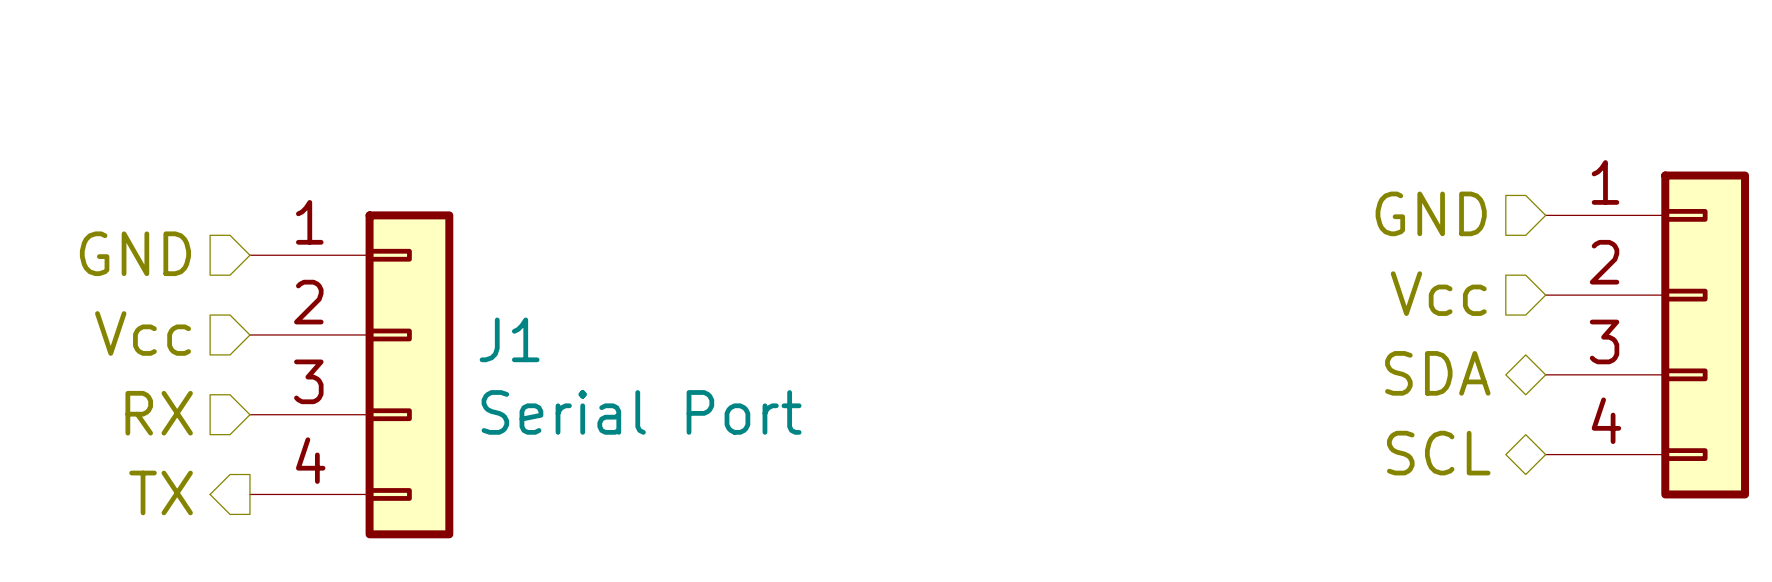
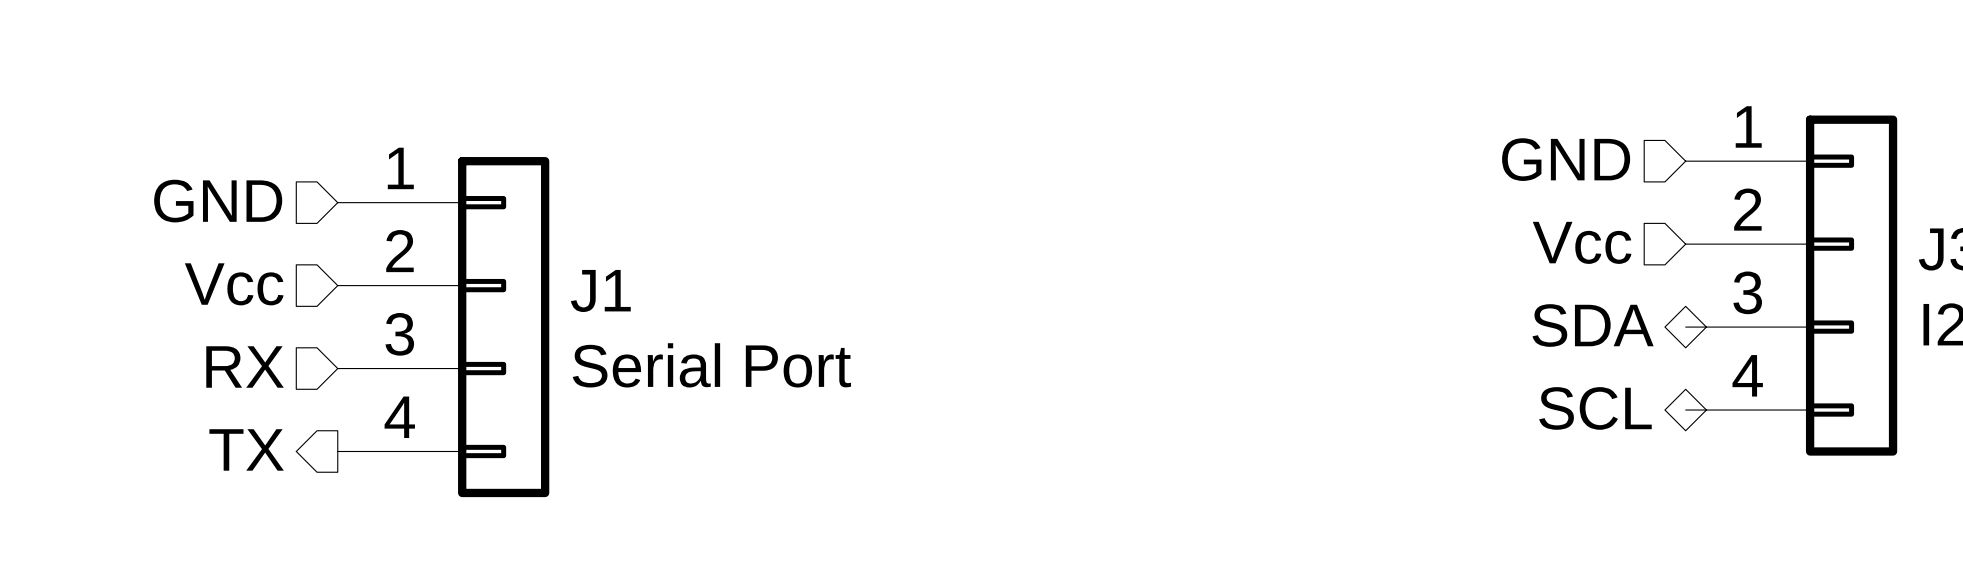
hierarchical label position: SDA (1437, 373) -> SDA (1593, 325)
hierarchical label position: SCL (1438, 453) -> SCL (1595, 408)

